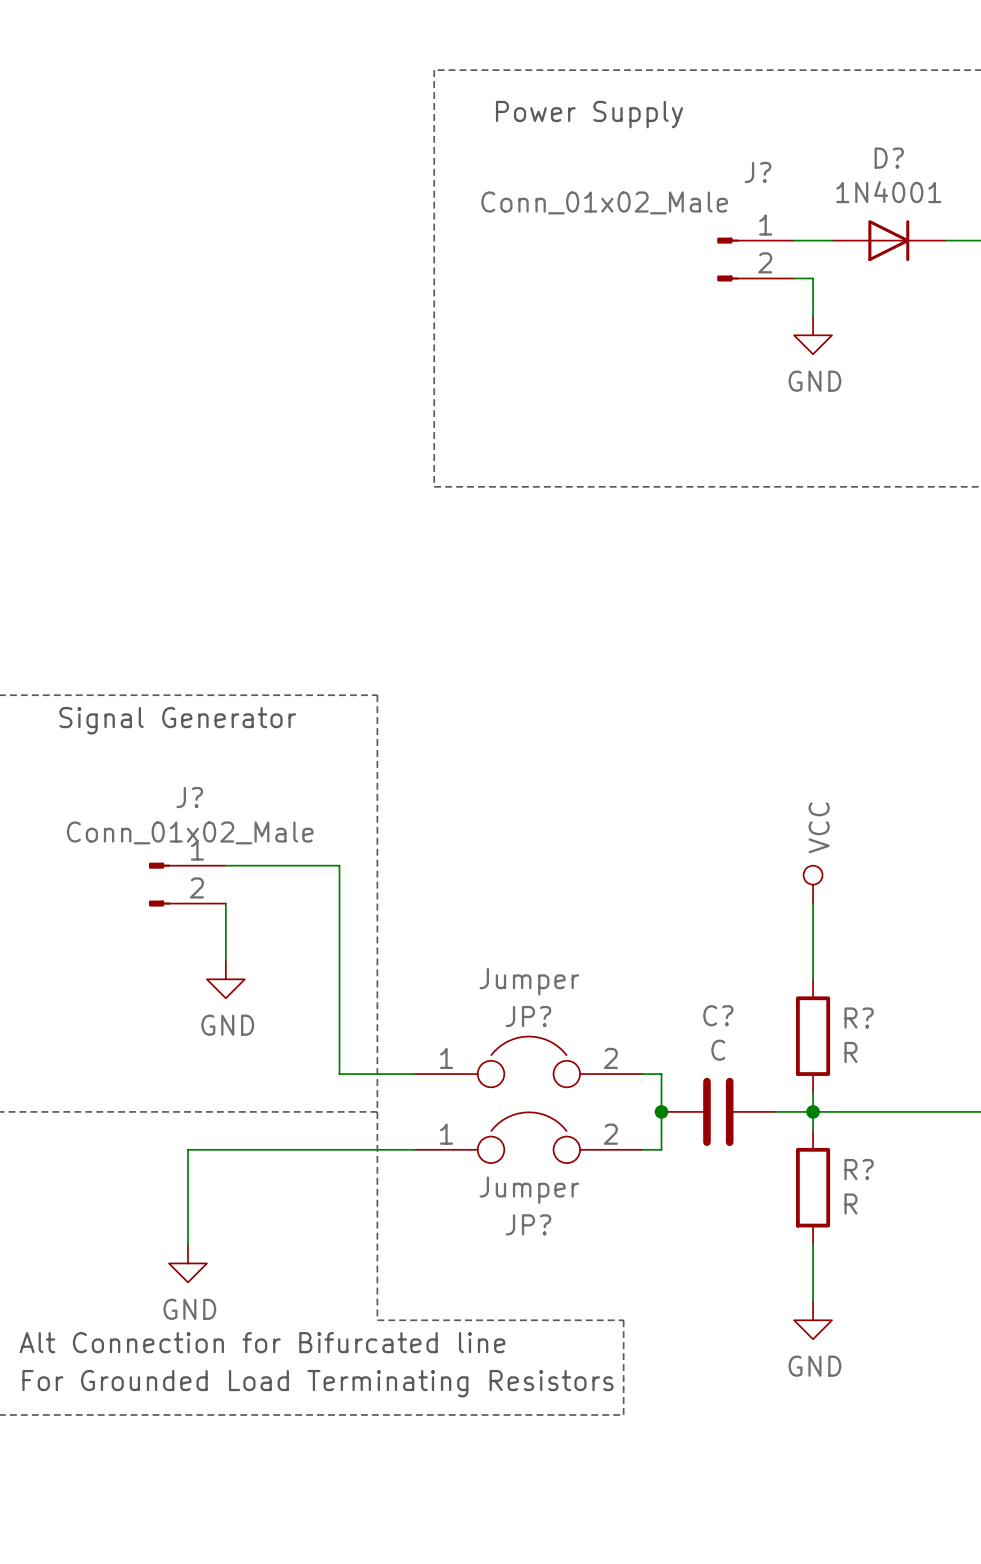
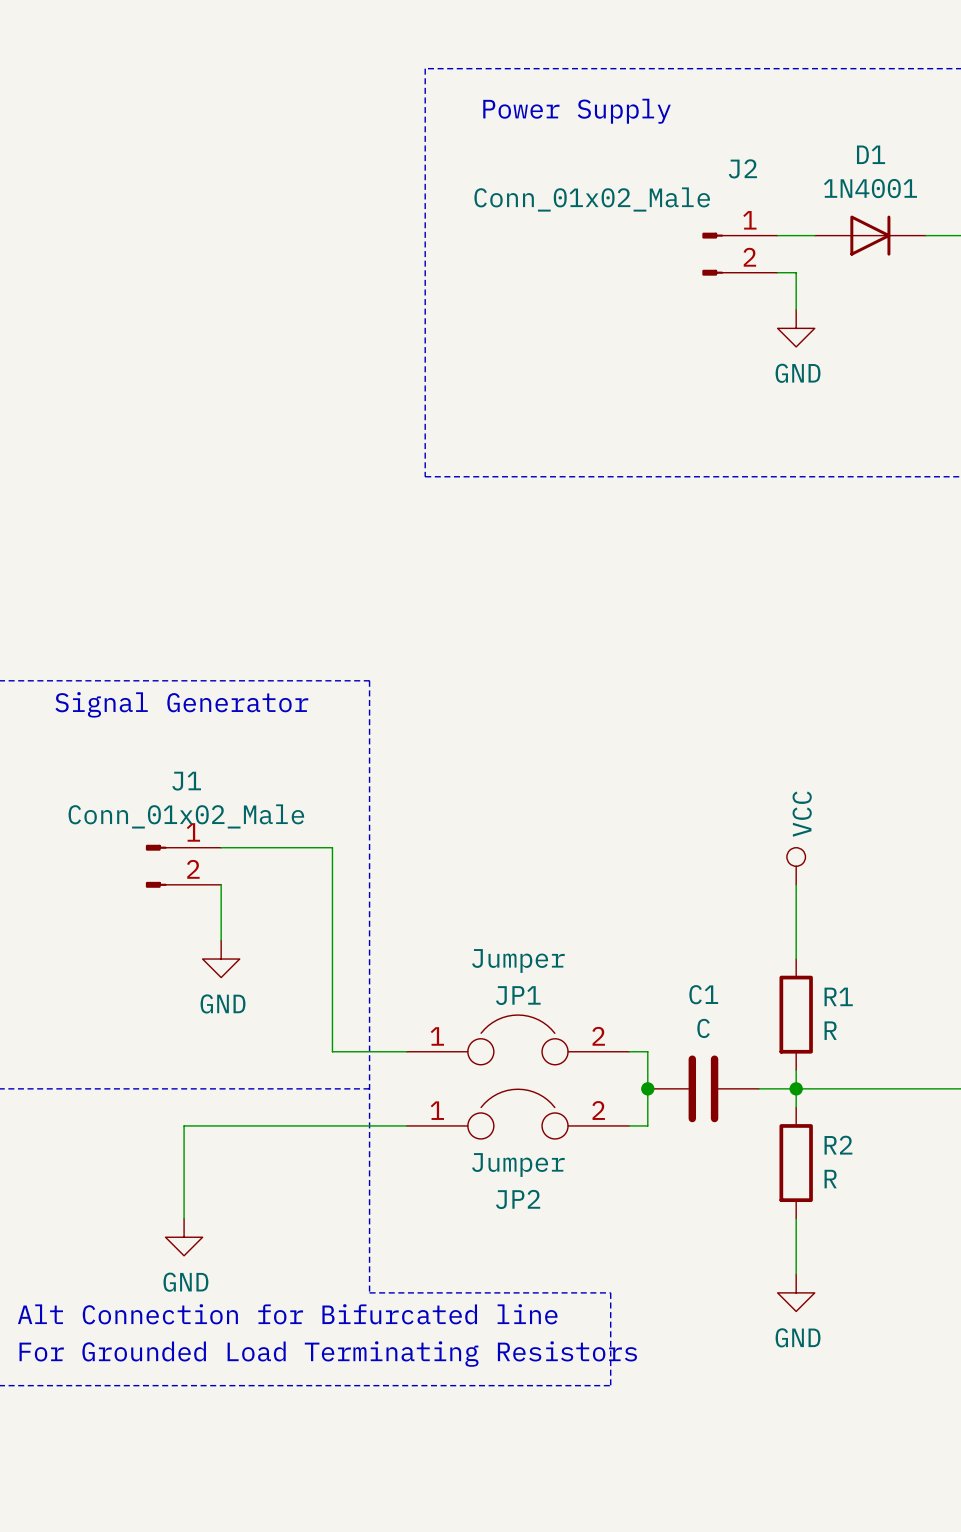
D? name: D? (889, 158) -> D1 (871, 154)
J? name: J? (758, 172) -> J2 (742, 168)
J? name: J? (189, 797) -> J1 (186, 781)
C? name: C? (718, 1015) -> C1 (703, 994)
JP? name: JP? (528, 1016) -> JP1 (518, 995)
R? name: R? (859, 1018) -> R1 (838, 996)
R? name: R? (859, 1169) -> R2 (838, 1145)
JP? name: JP? (528, 1224) -> JP2 (518, 1199)

